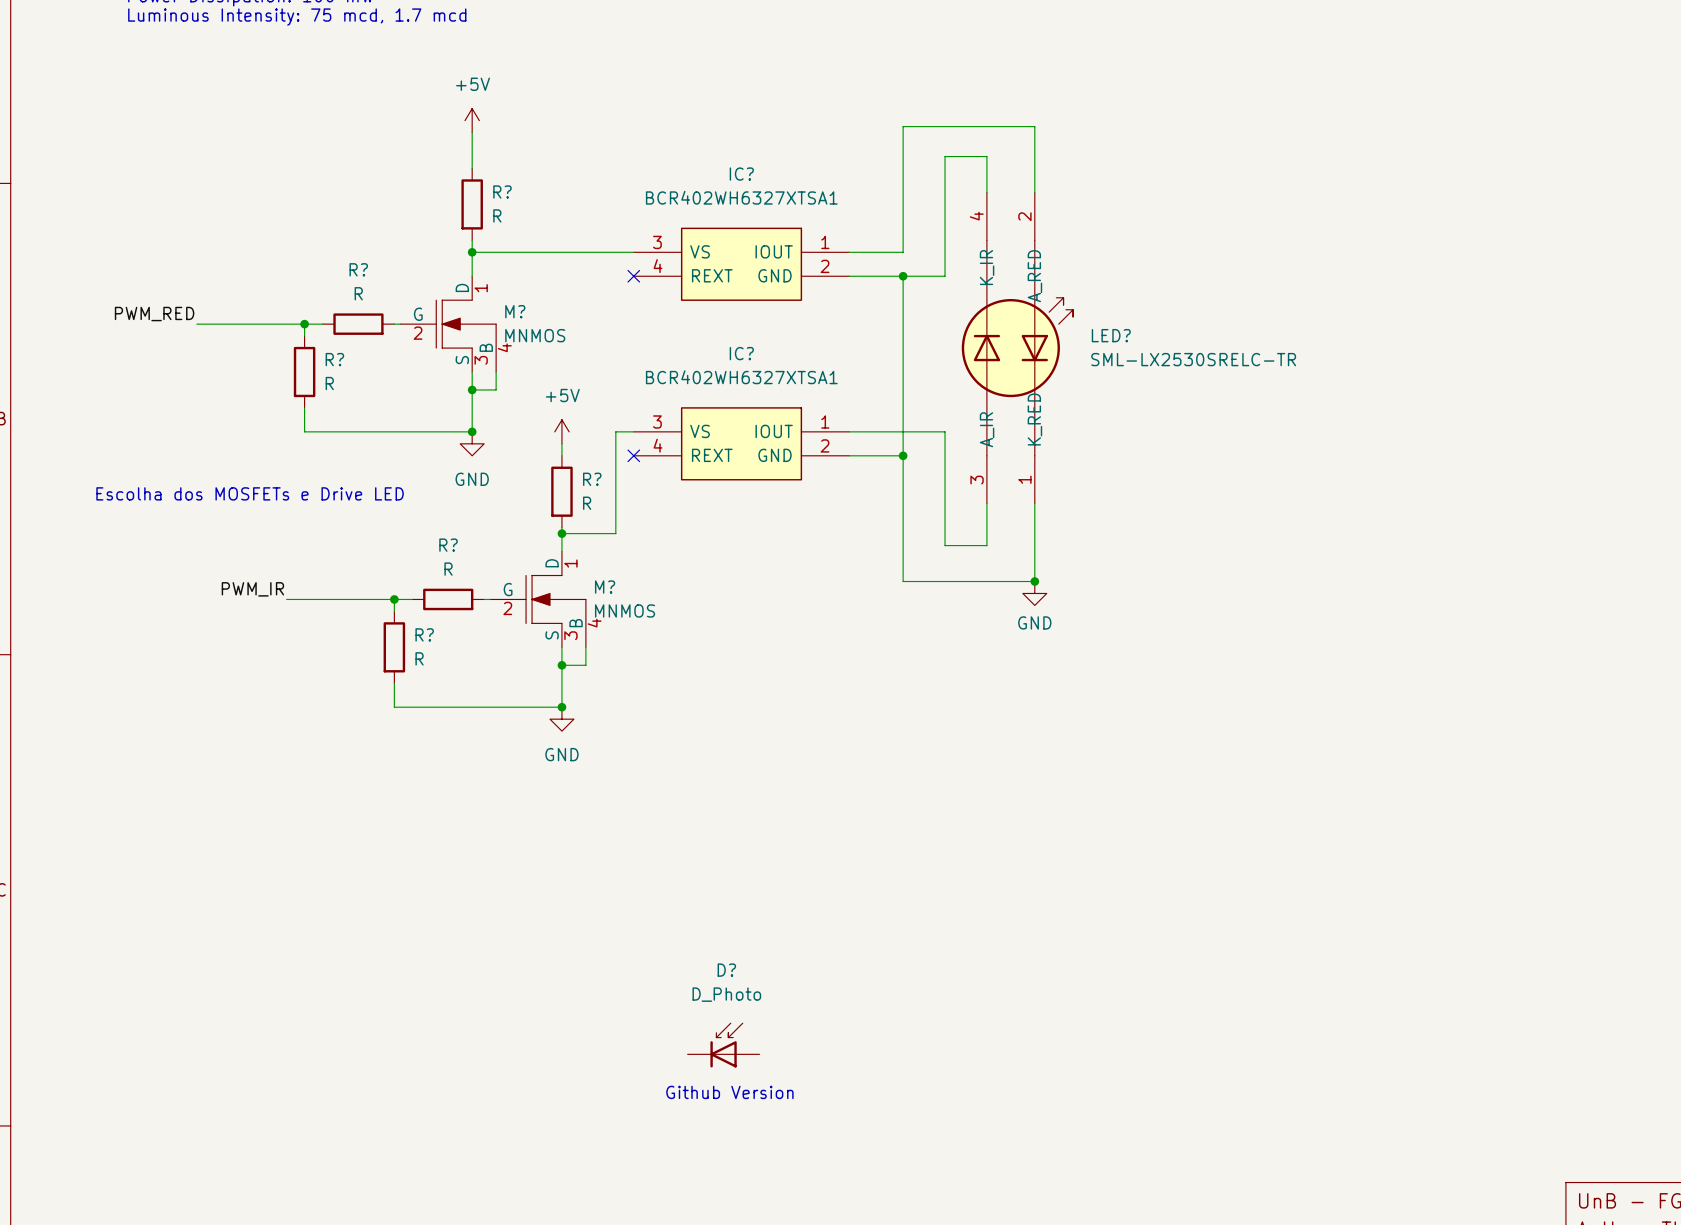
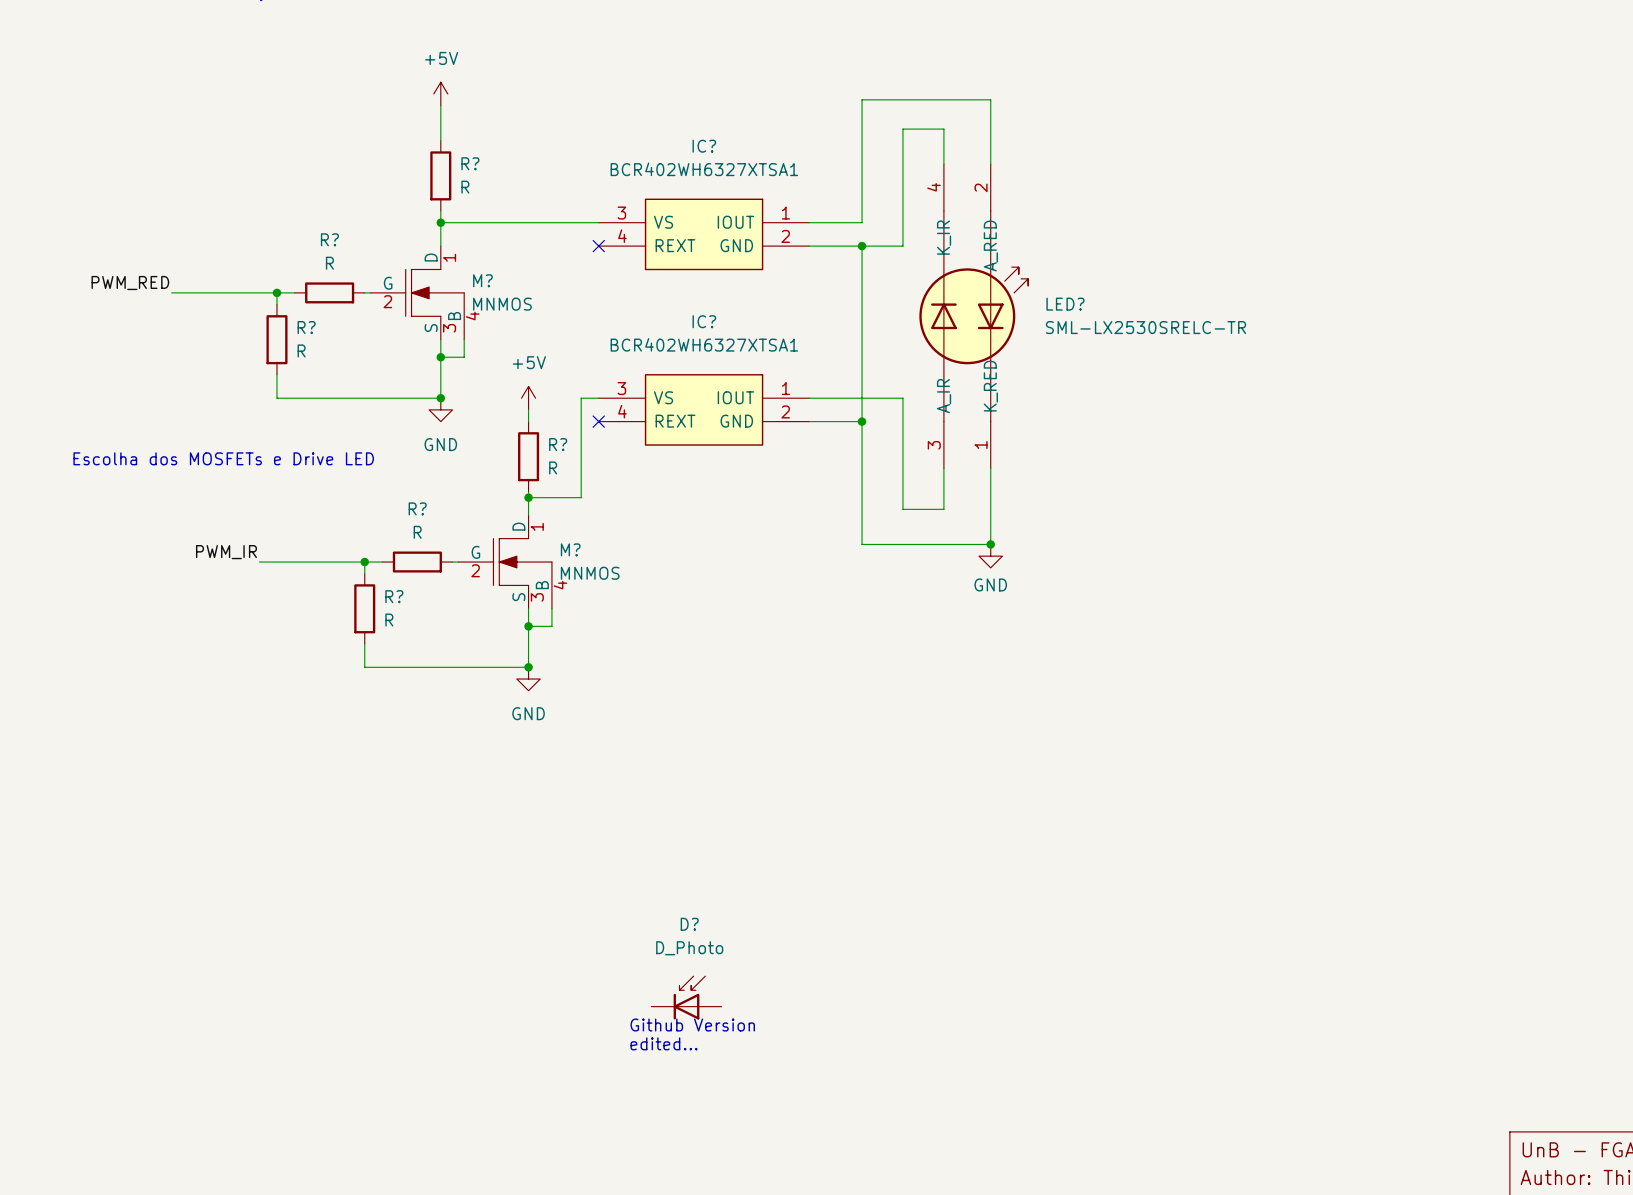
text: none -> Github Version (692, 1025)
text: Github Version (729, 1092) -> edited... (664, 1043)

